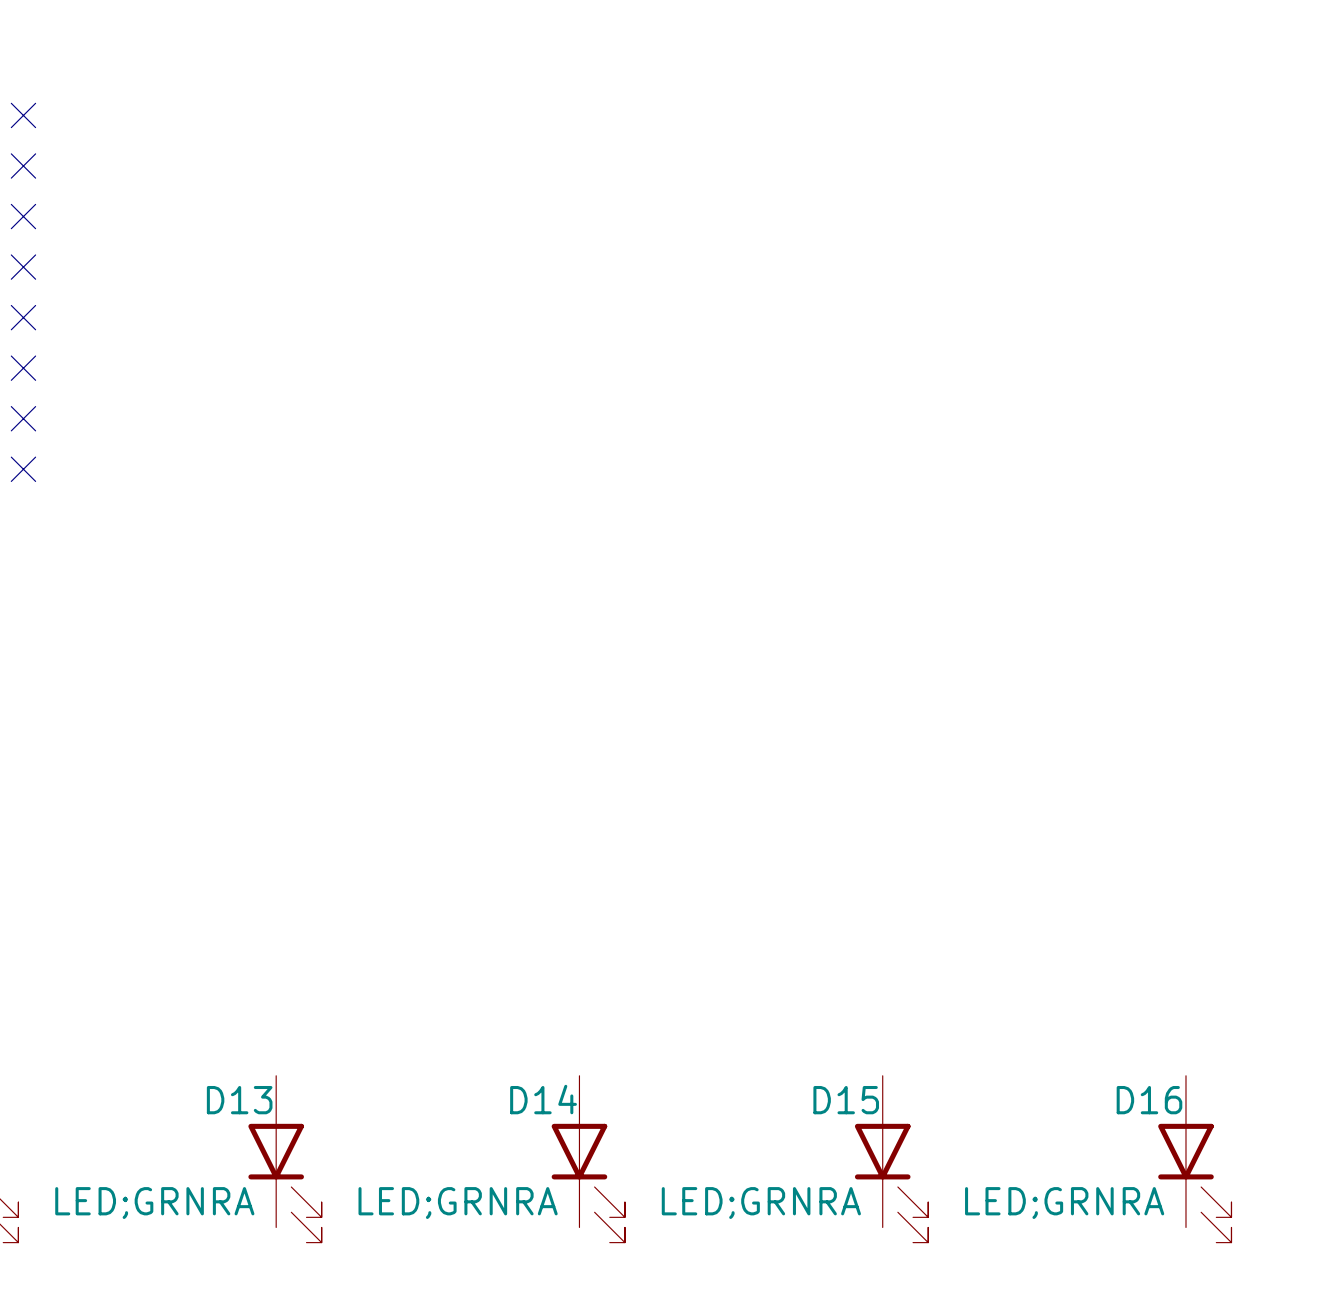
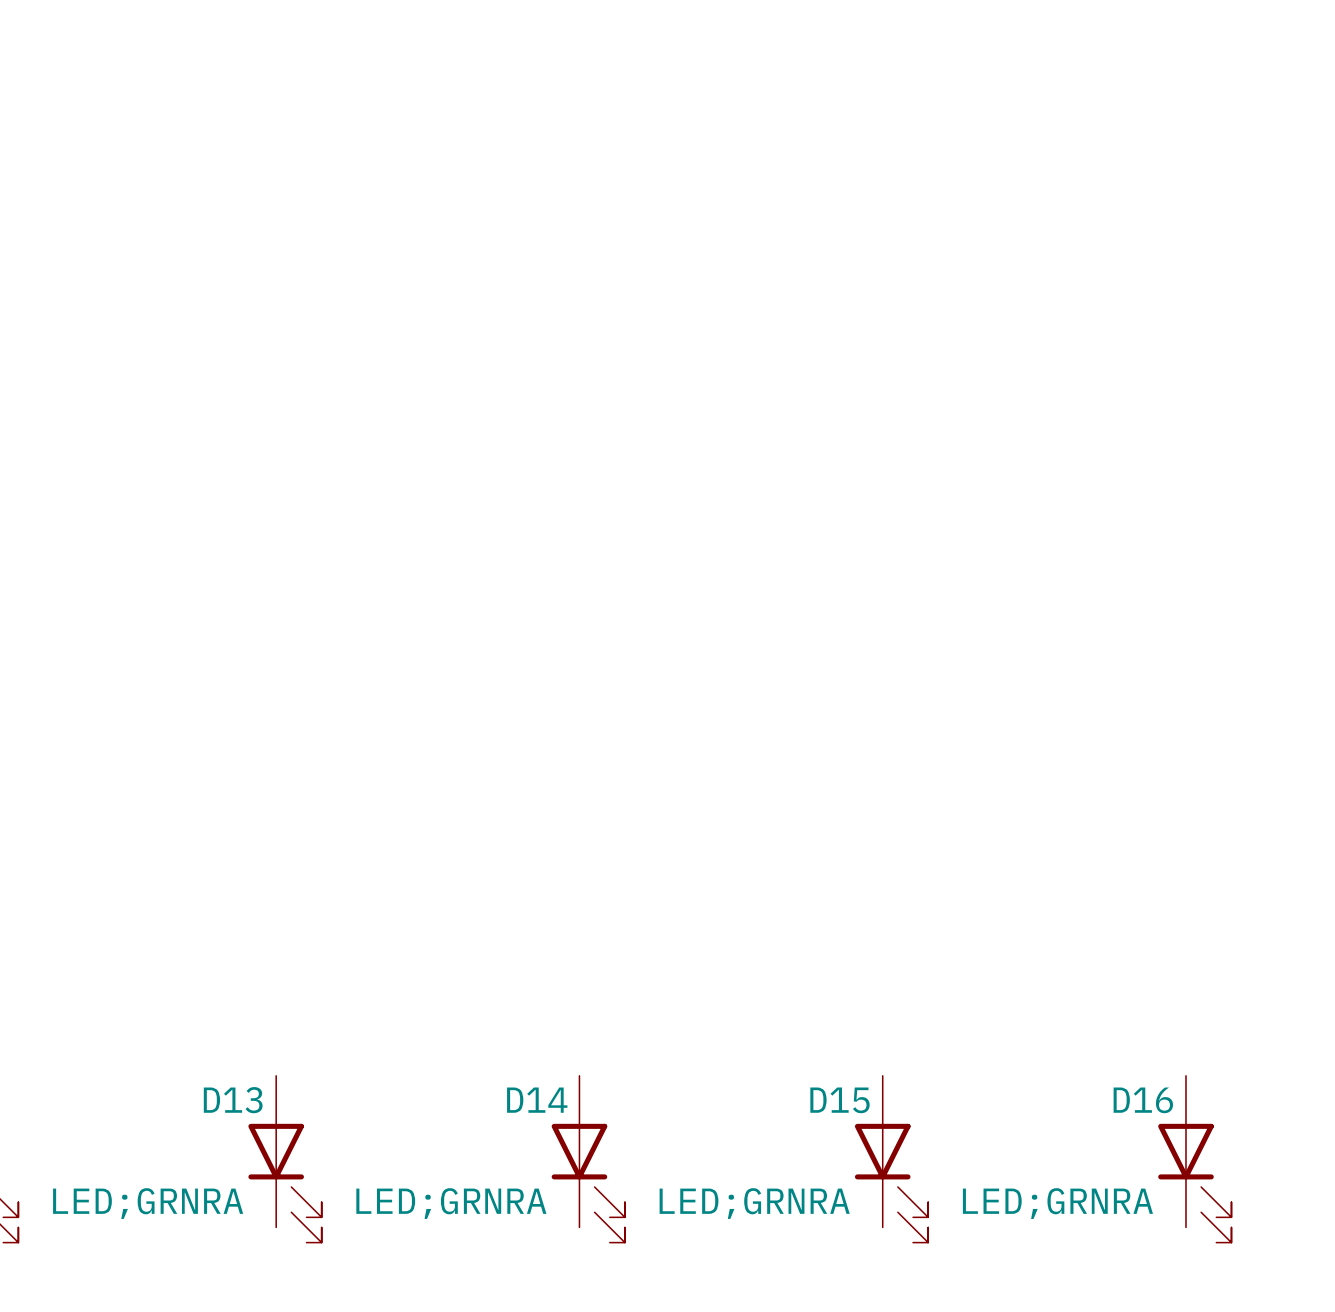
no-connect mark: (23, 115) -> none
no-connect mark: (23, 166) -> none
no-connect mark: (23, 216) -> none
no-connect mark: (23, 267) -> none
no-connect mark: (23, 317) -> none
no-connect mark: (23, 368) -> none
no-connect mark: (23, 418) -> none
no-connect mark: (23, 469) -> none

